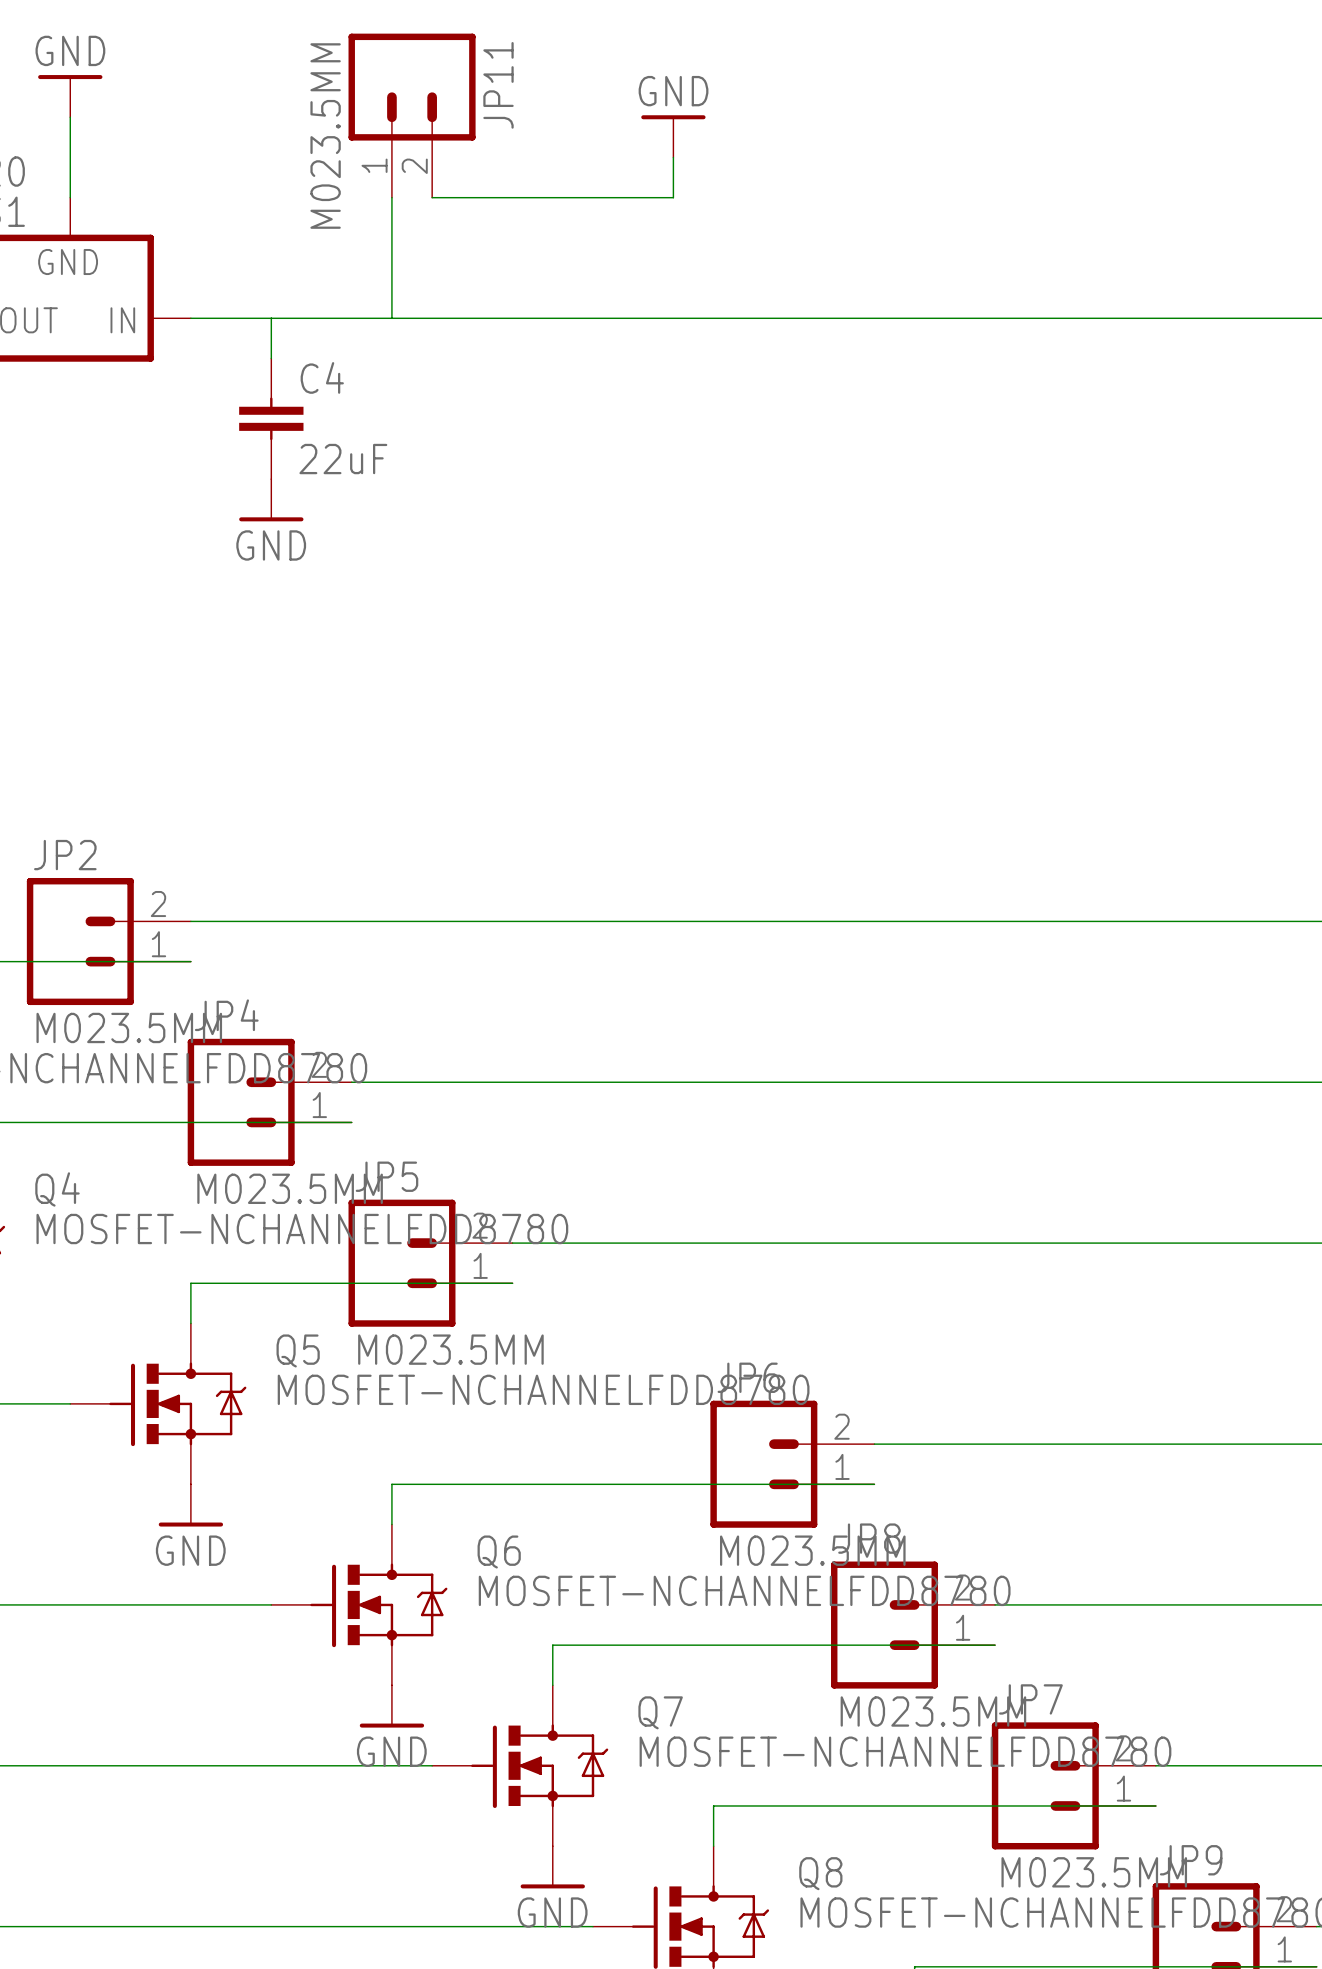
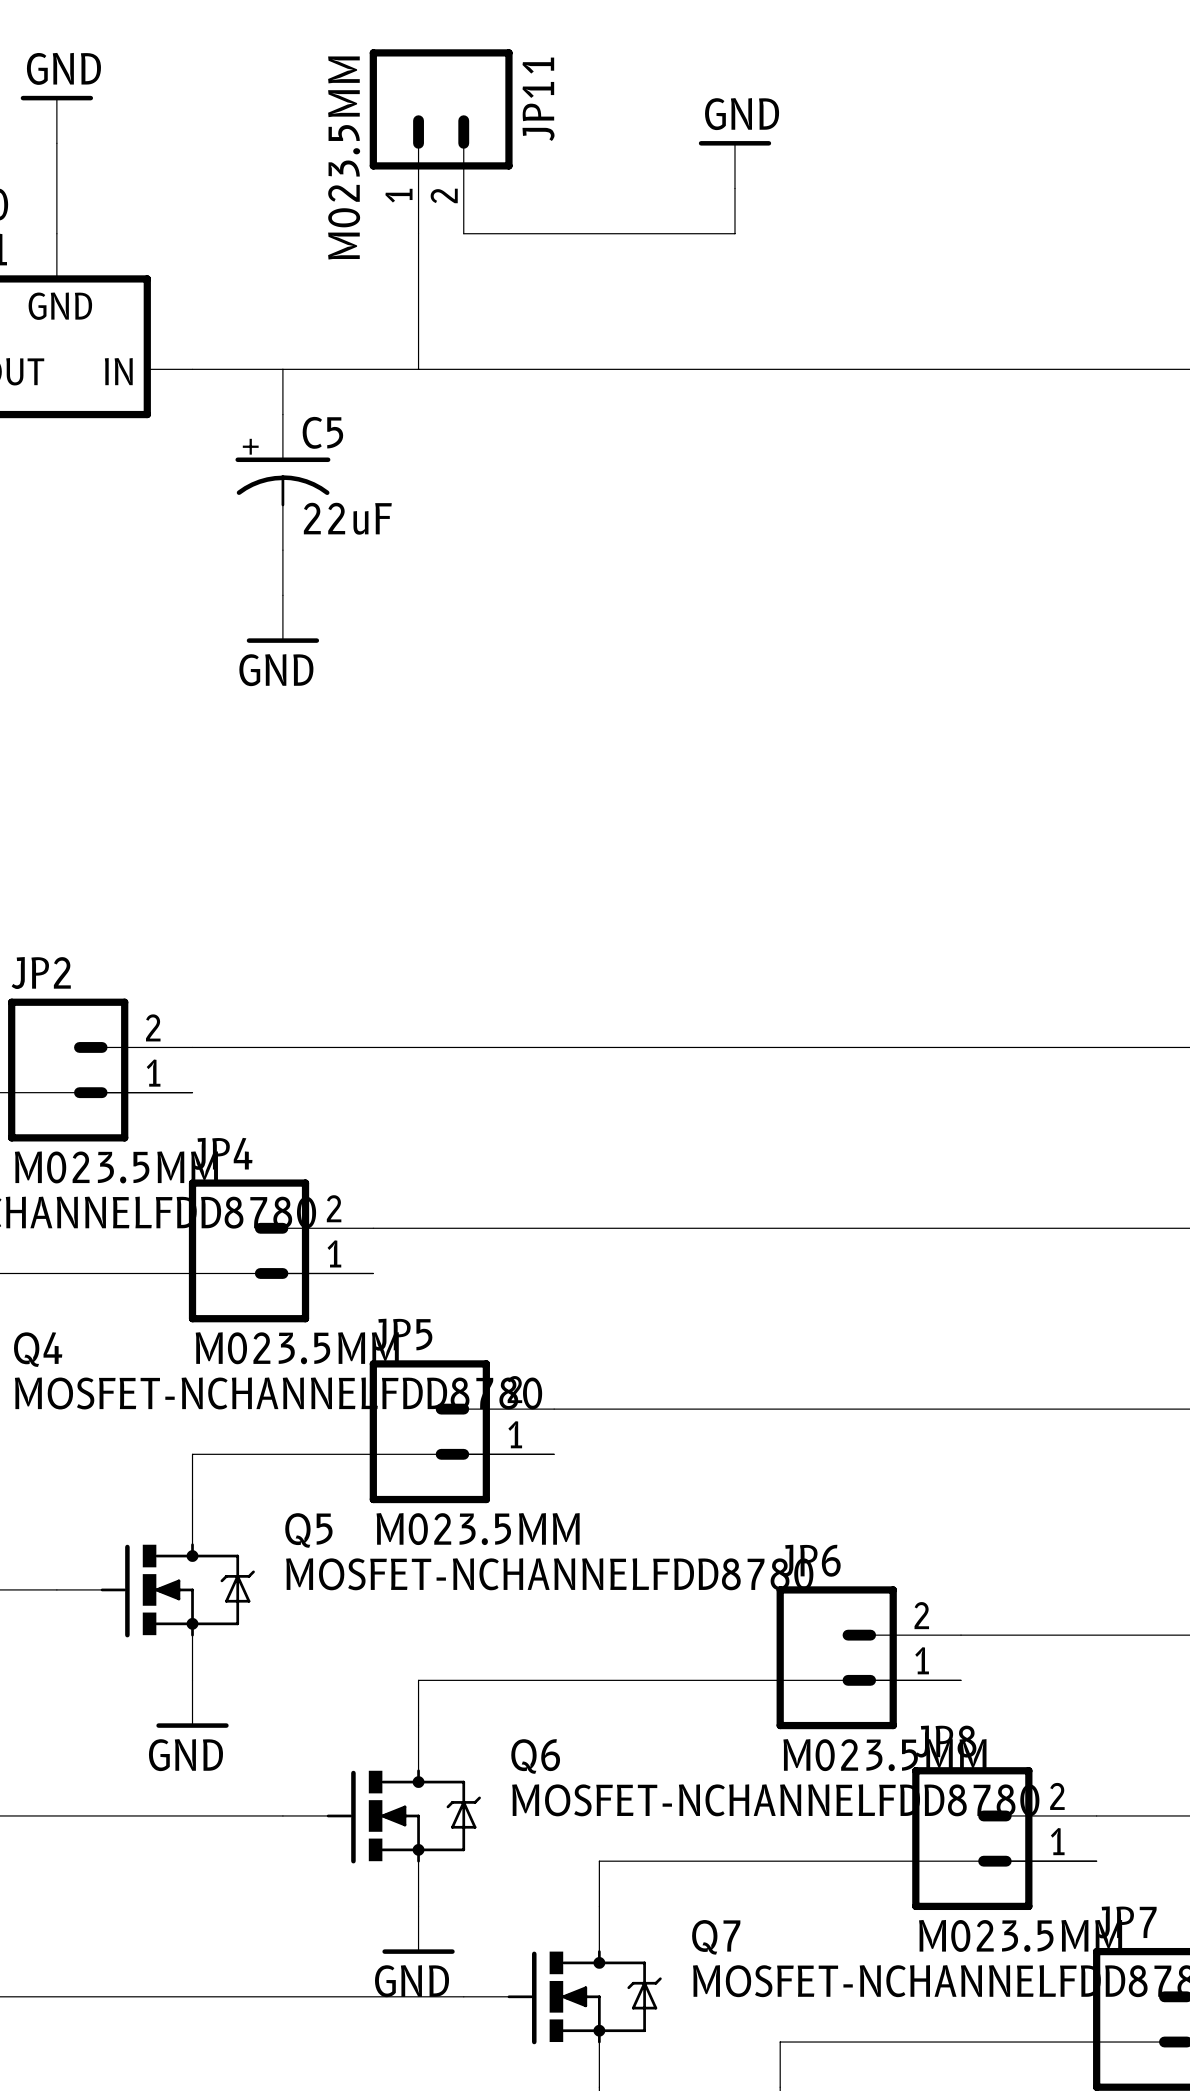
C4: 22uF (271, 418) -> none
C5: none -> 22uF (282, 482)
power symbol position: GND (271, 500) -> GND (282, 619)

